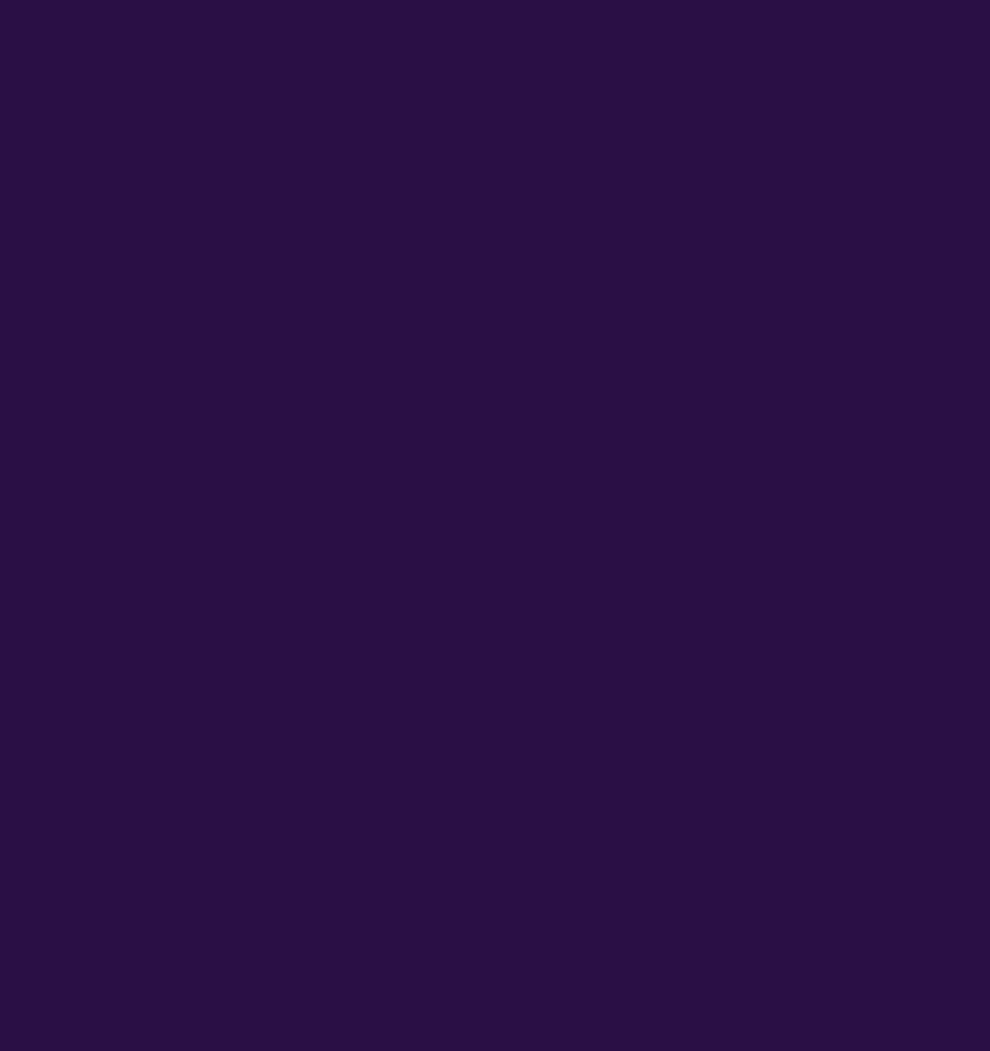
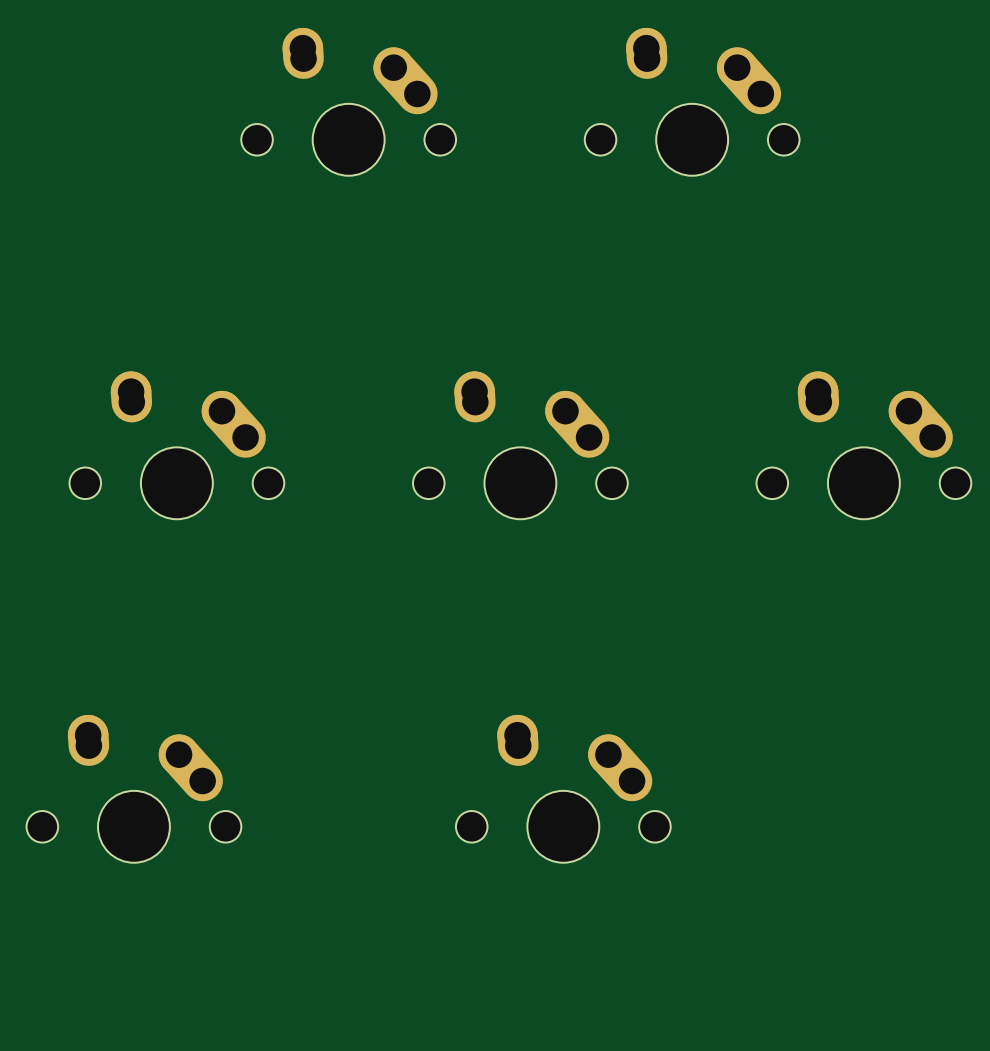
part: none -> (348, 101)
part: none -> (692, 101)
part: none -> (176, 445)
part: none -> (520, 445)
part: none -> (863, 445)
part: none -> (133, 788)
part: none -> (563, 788)

